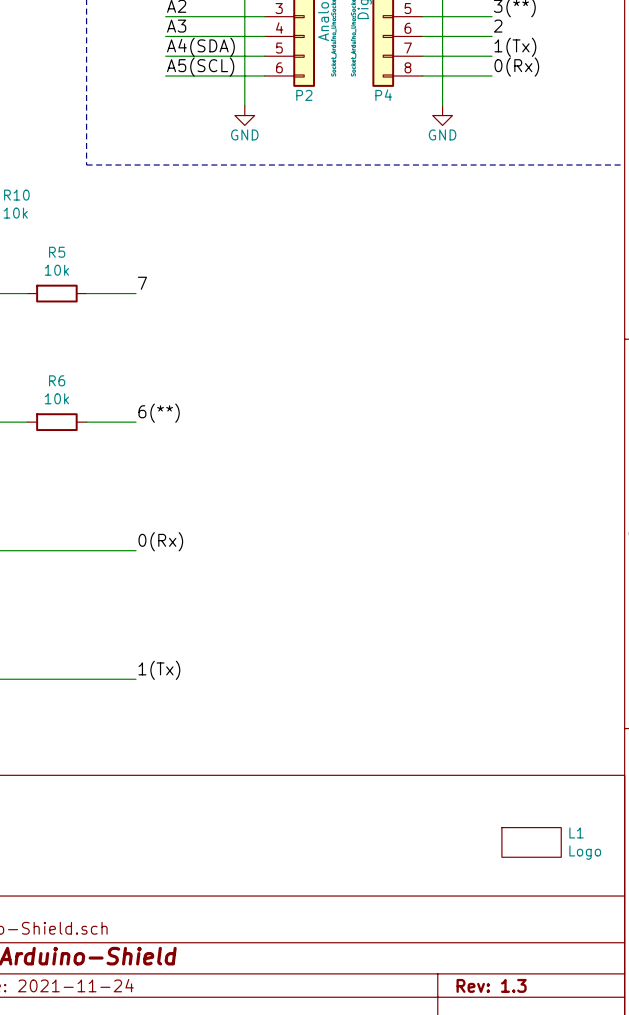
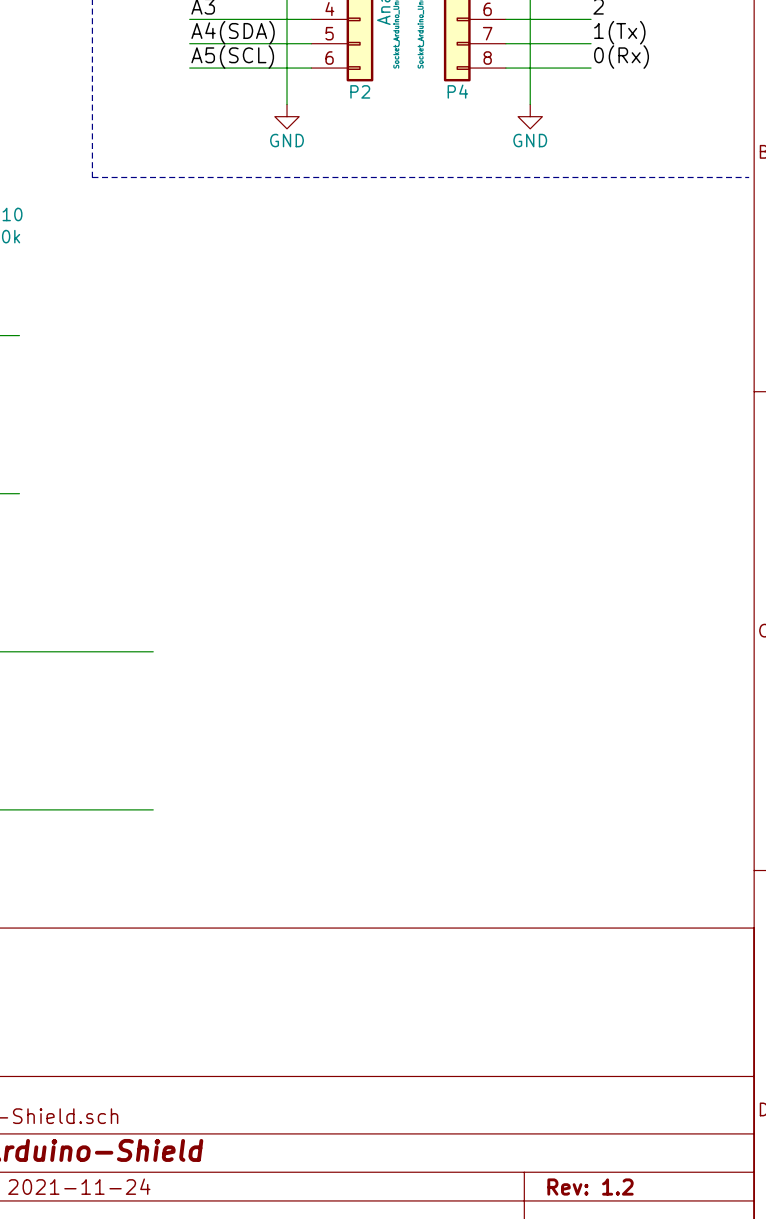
label: 7 (142, 283) -> none
R5: 10k (56, 293) -> none
wire: (86, 293) (136, 293) -> none
label: 6(**) (159, 413) -> none
R6: 10k (56, 422) -> none
wire: (86, 422) (136, 422) -> none
label: 0(Rx) (160, 541) -> none
label: 1(Tx) (159, 670) -> none
L1: Logo (531, 842) -> none
title block: Rev: 1.3 (491, 985) -> Rev: 1.2 (590, 1187)

